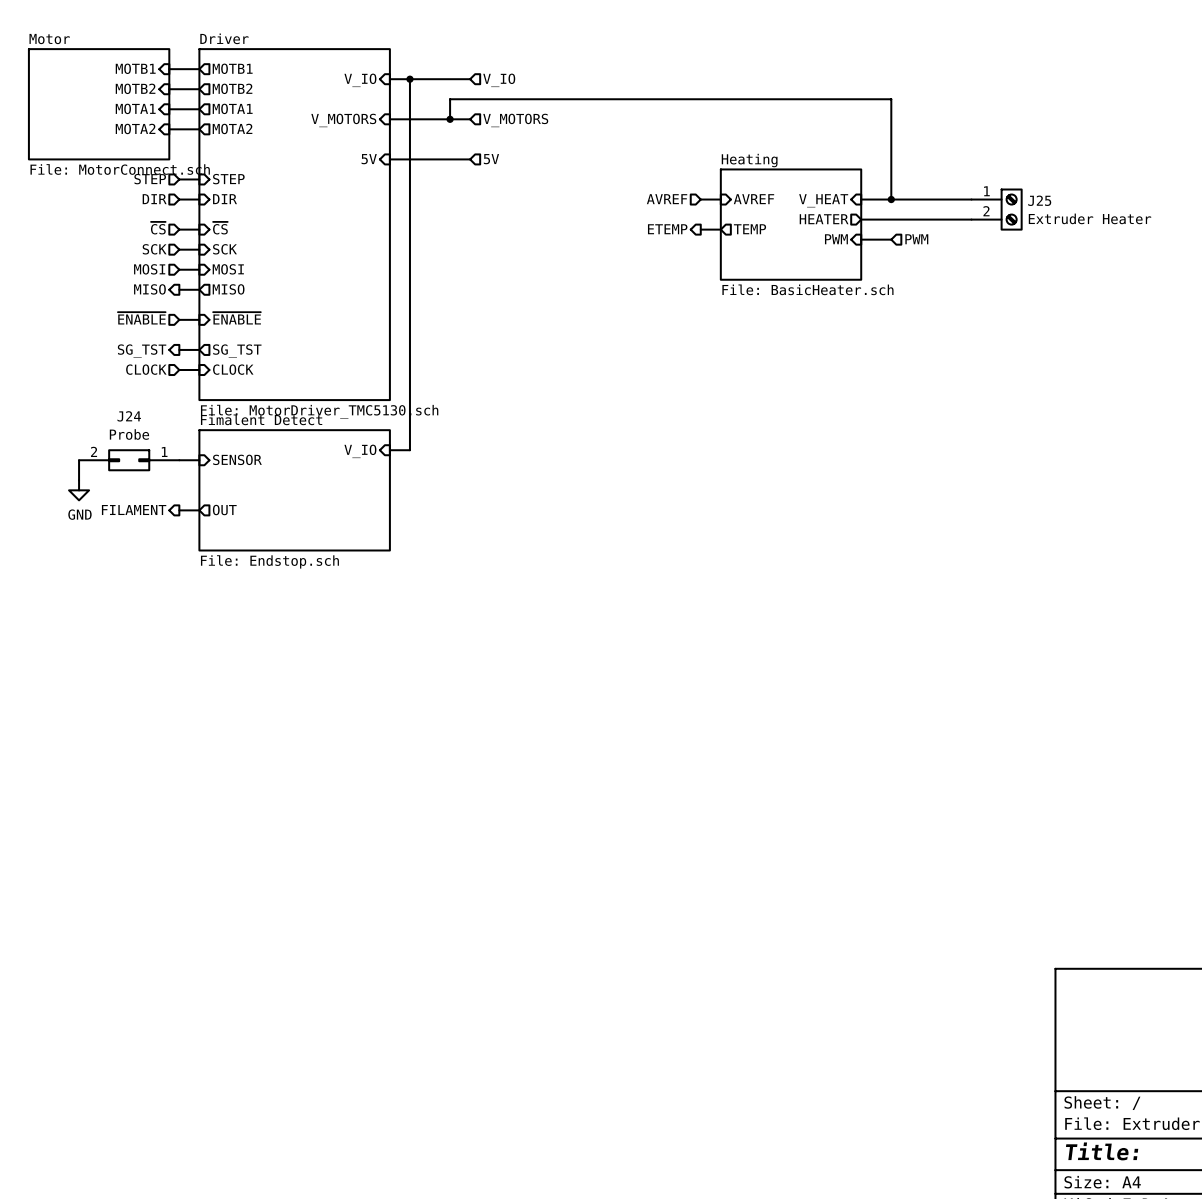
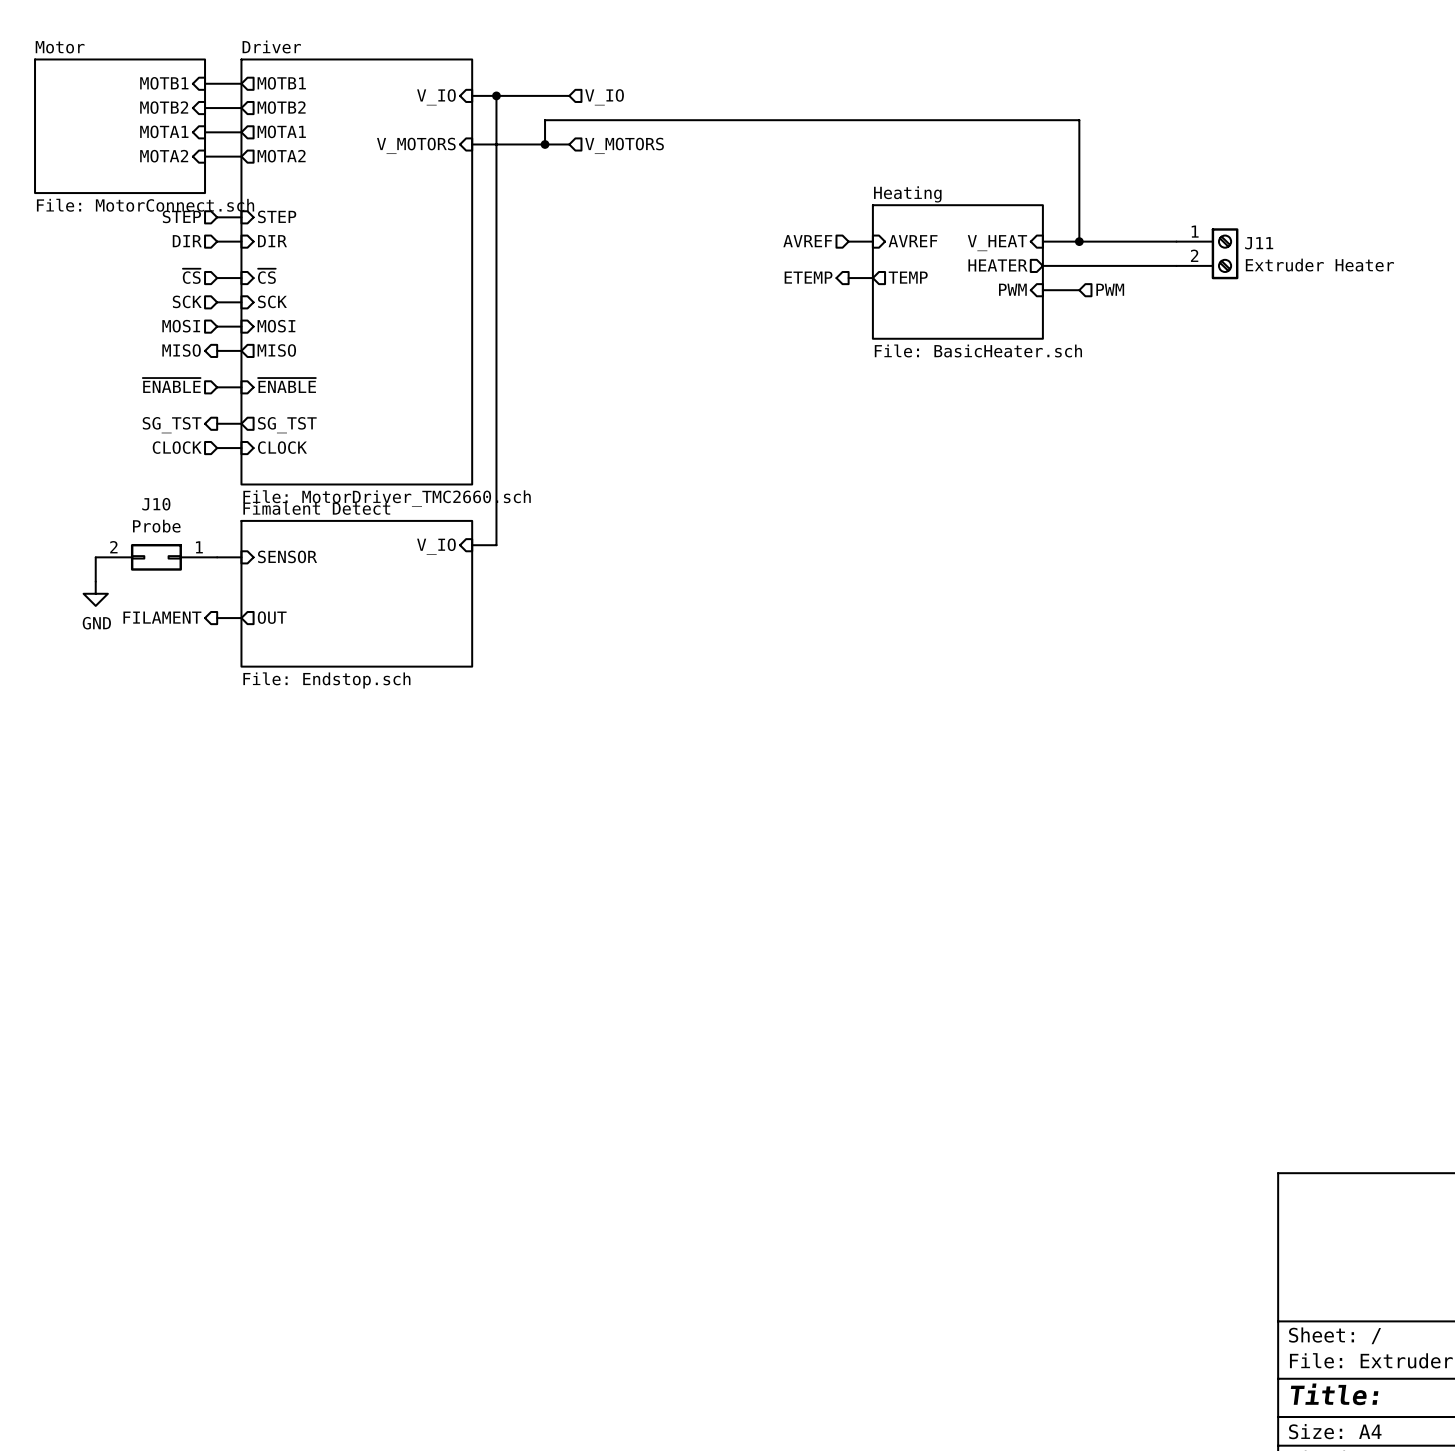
sheet pin: 5V (369, 159) -> none
wire: (389, 159) (470, 159) -> none
hierarchical label: 5V (491, 159) -> none
J25 name: J25 (1039, 200) -> J11 (1259, 243)
sheet Driver value: File: MotorDriver_TMC5130.sch (319, 411) -> File: MotorDriver_TMC2660.sch (387, 498)
J24 name: J24 (129, 416) -> J10 (156, 504)

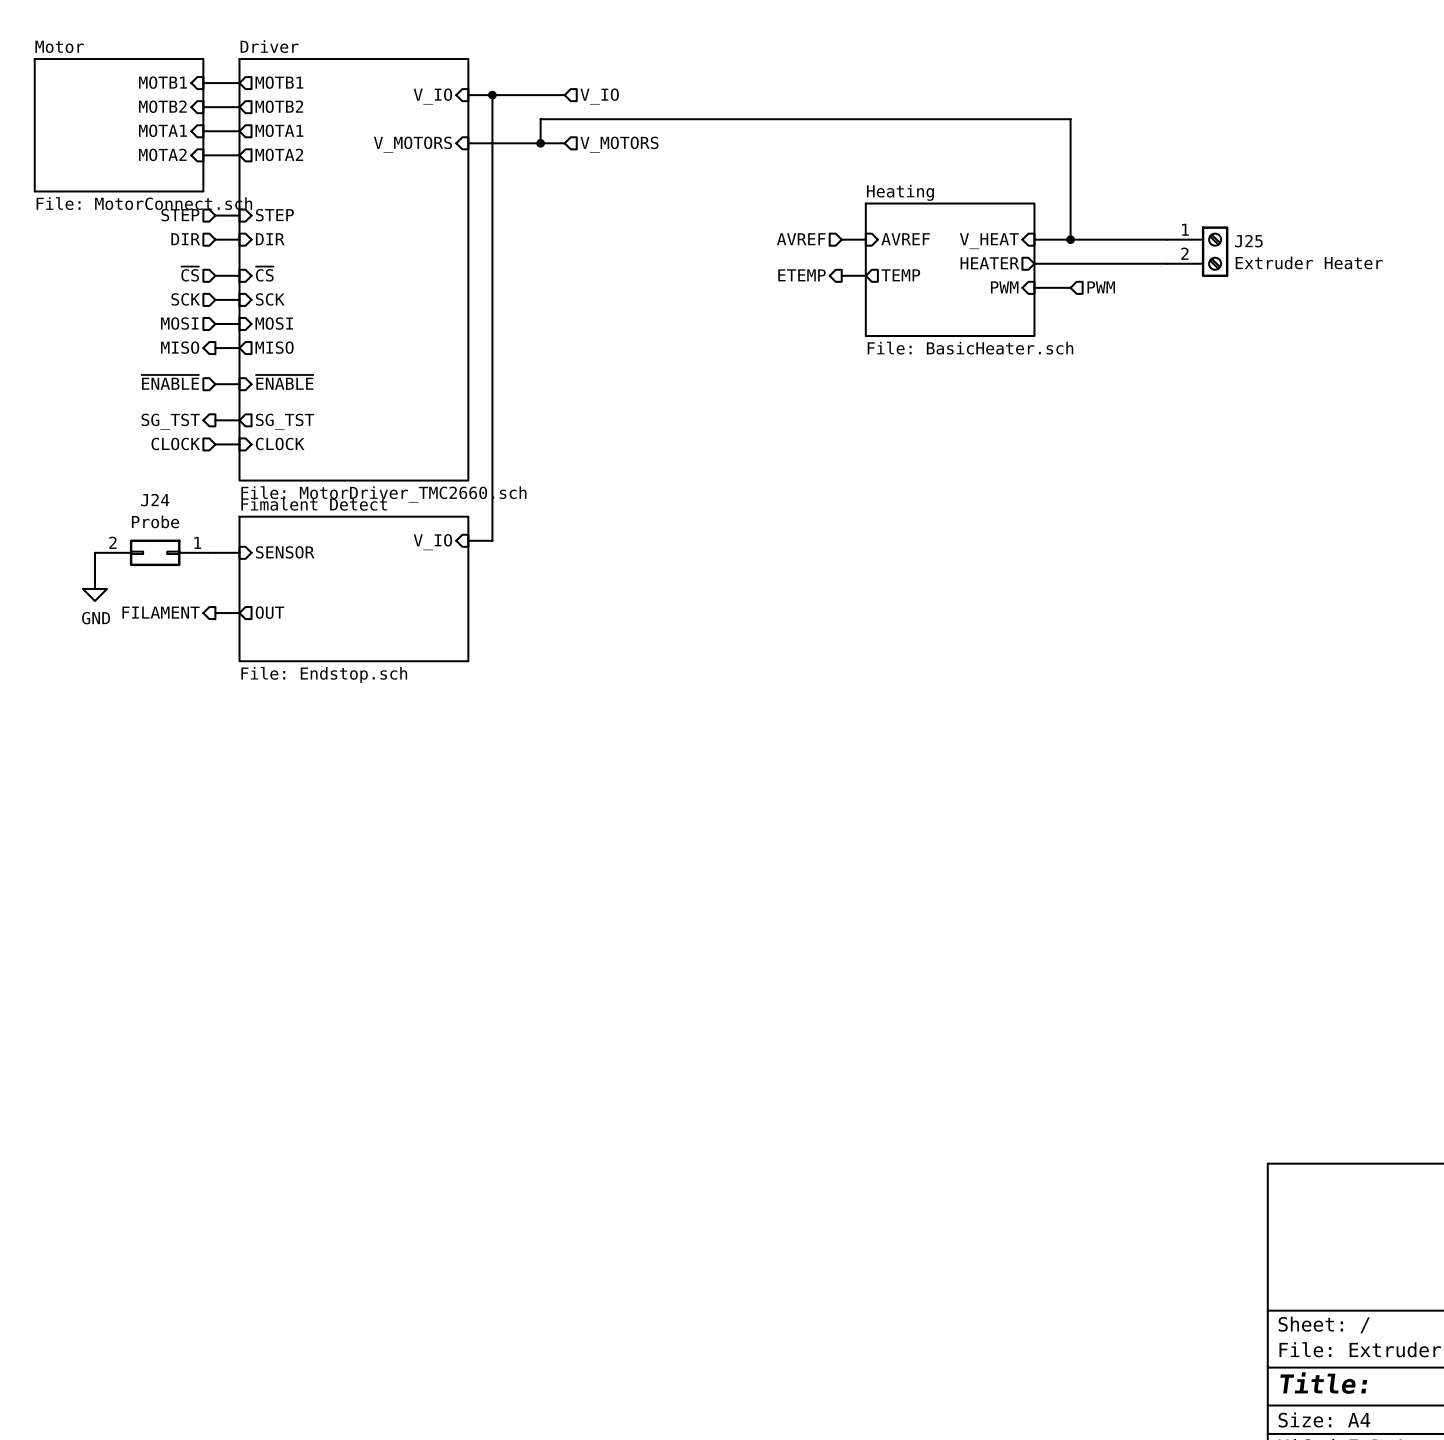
J11 name: J11 (1259, 243) -> J25 (1248, 241)
J10 name: J10 (156, 504) -> J24 (155, 500)

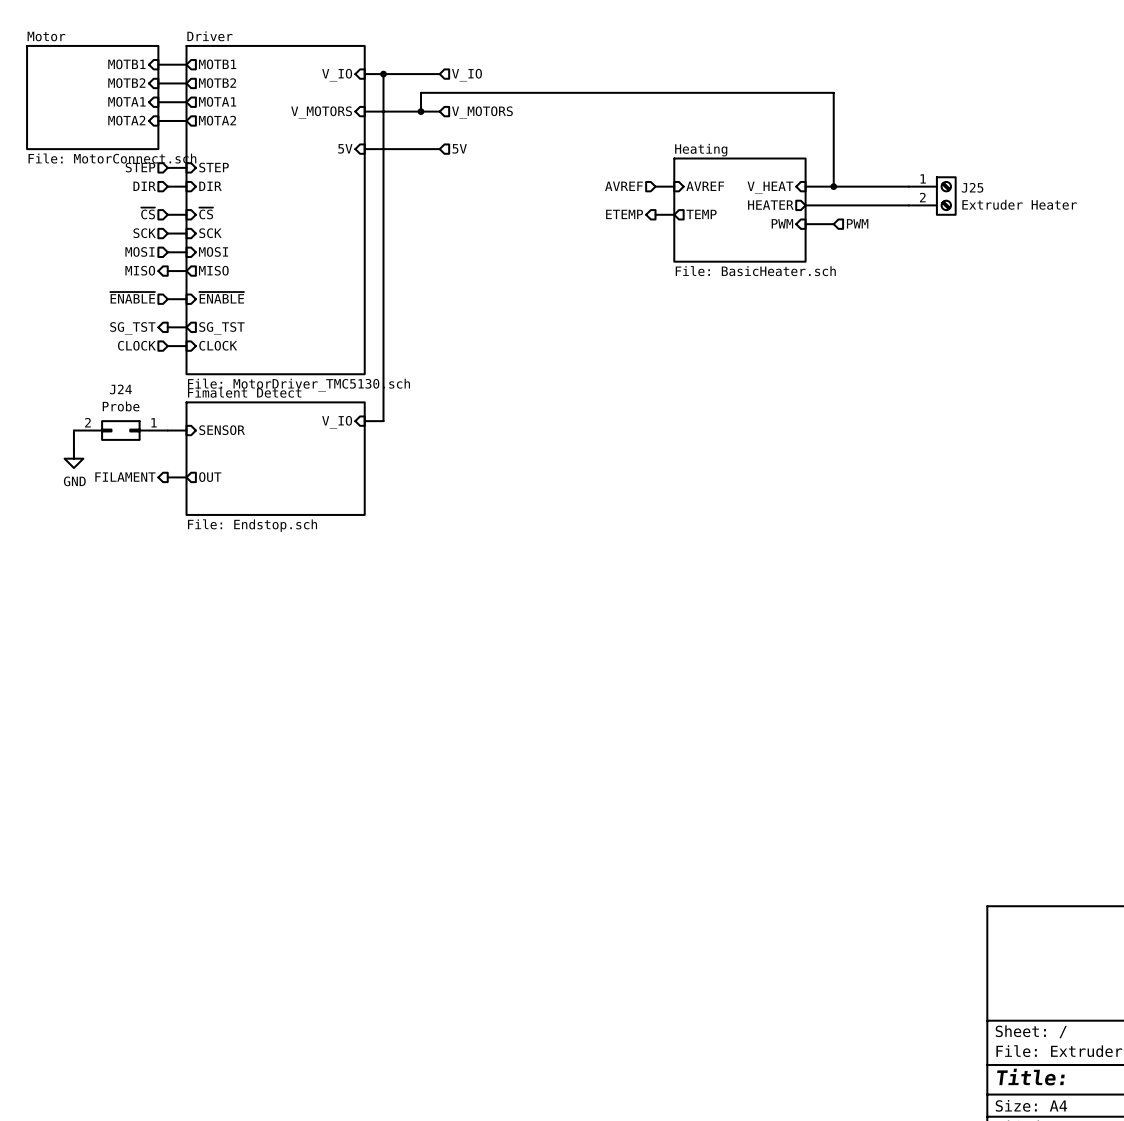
sheet pin: none -> 5V (345, 148)
wire: none -> (364, 149) (439, 149)
hierarchical label: none -> 5V (459, 148)
sheet Driver value: File: MotorDriver_TMC2660.sch (383, 494) -> File: MotorDriver_TMC5130.sch (298, 385)

